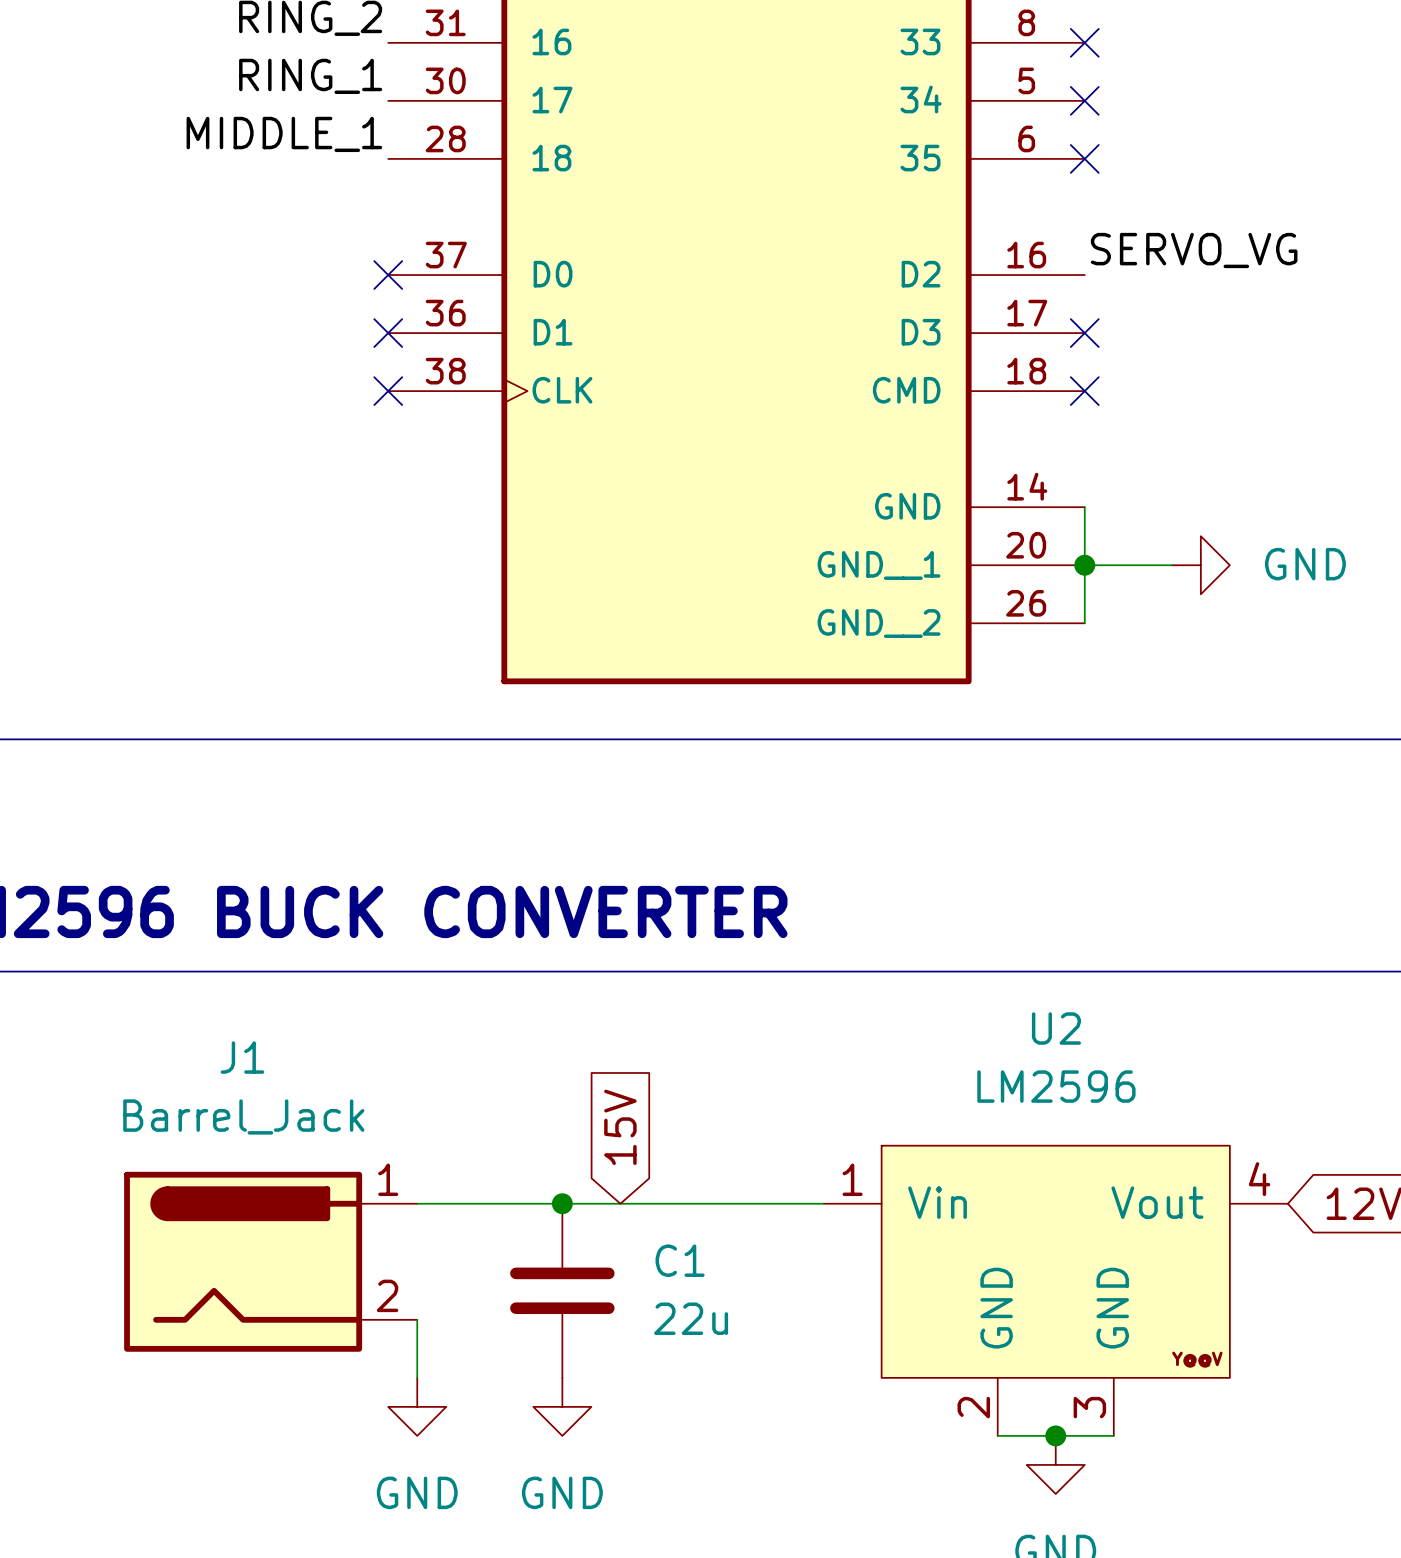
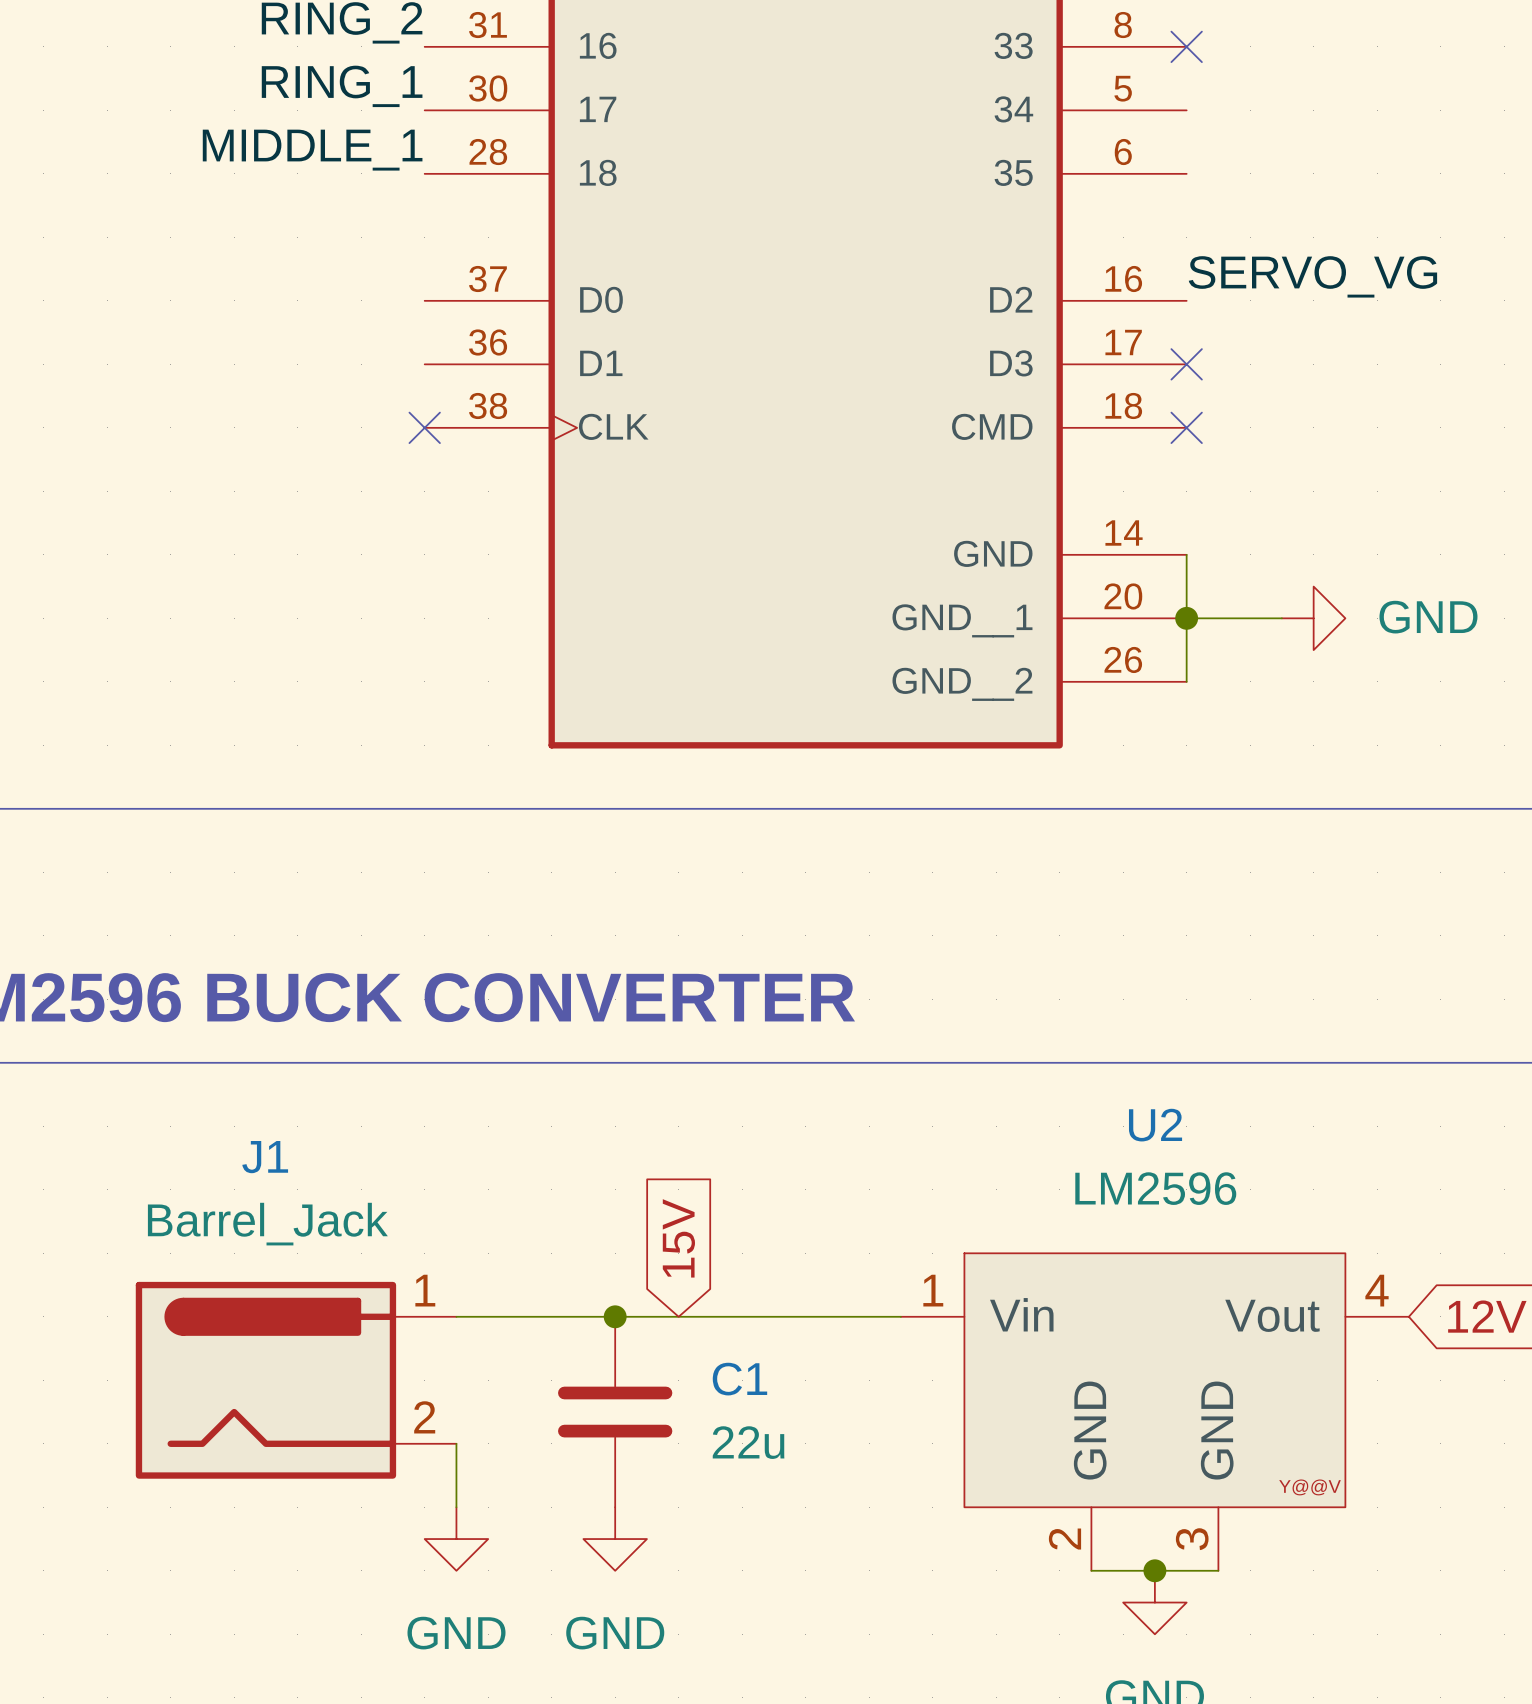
no-connect mark: (1084, 100) -> none
no-connect mark: (1084, 158) -> none
no-connect mark: (388, 275) -> none
no-connect mark: (388, 333) -> none

